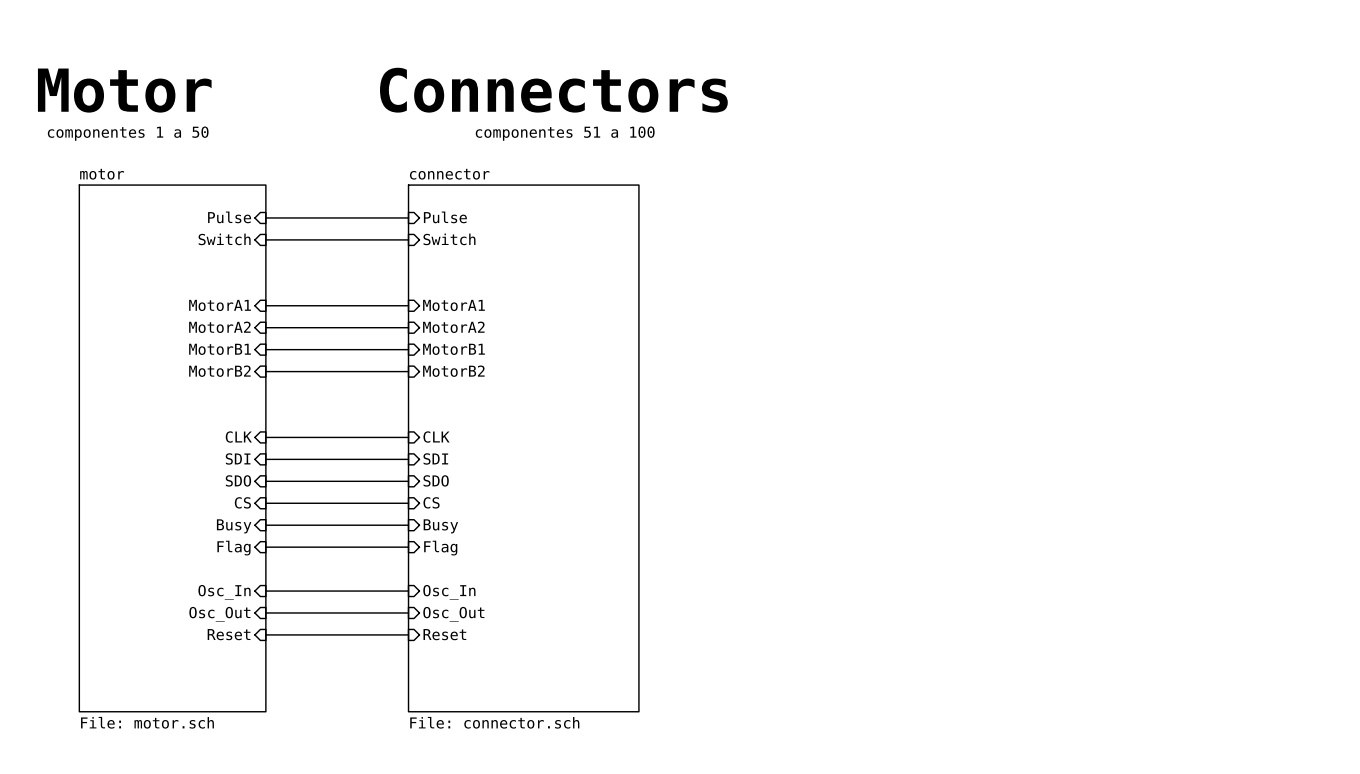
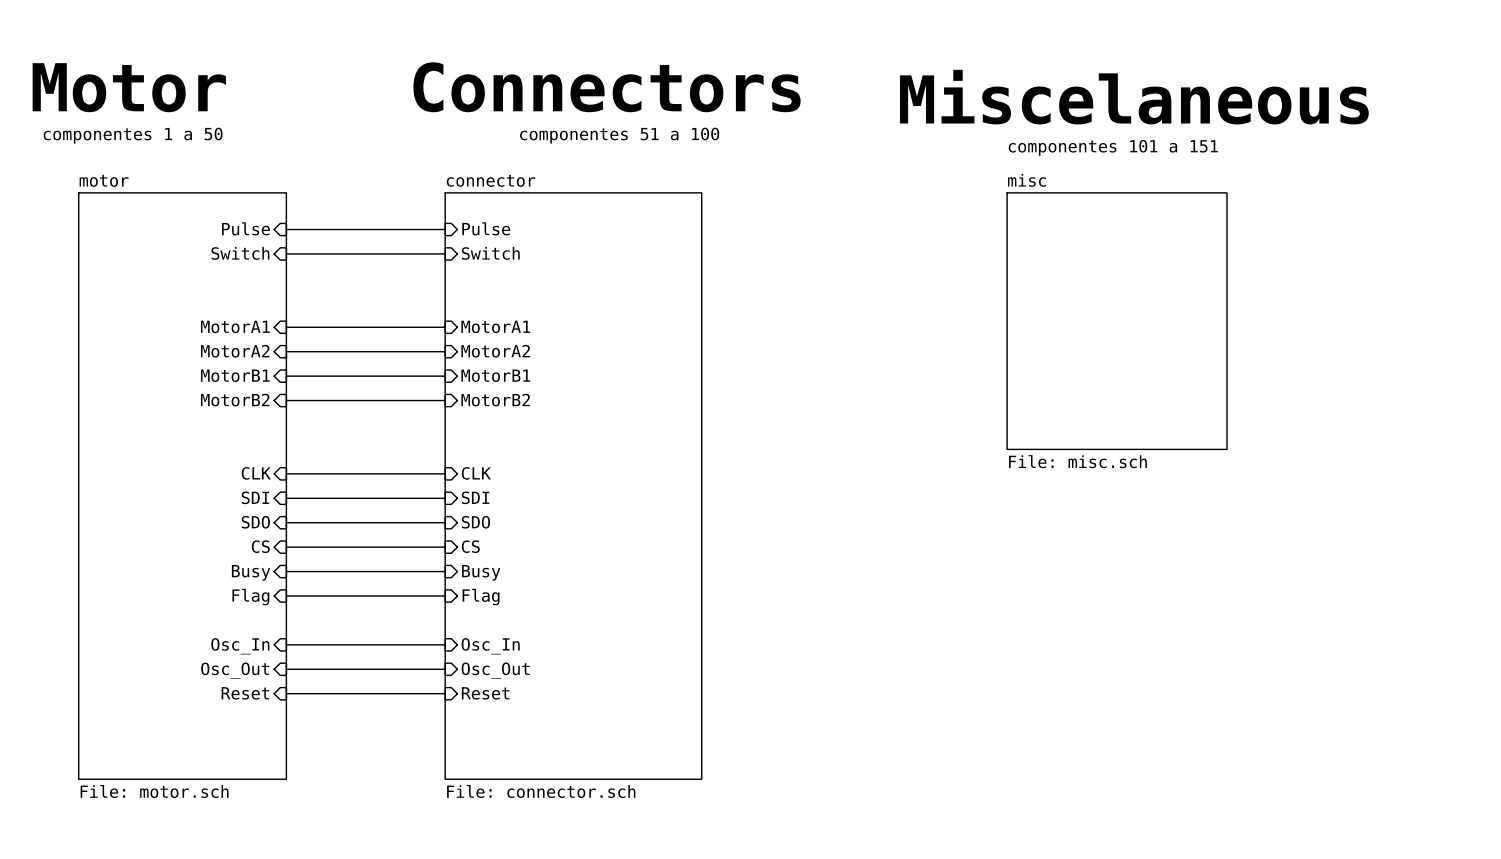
text: none -> Miscelaneous (1134, 97)
text: none -> componentes 101 a 151 (1113, 147)
sheet misc: none -> File: misc.sch (1117, 321)

